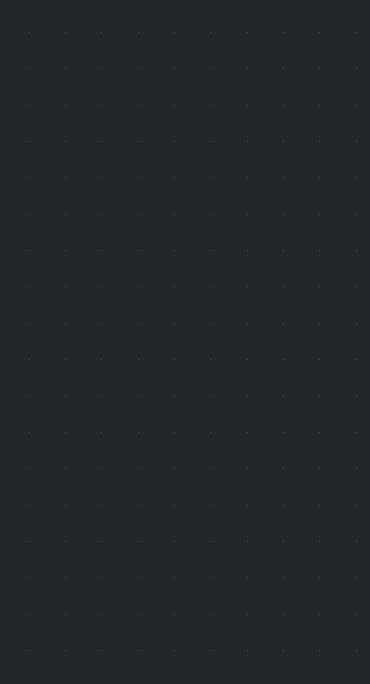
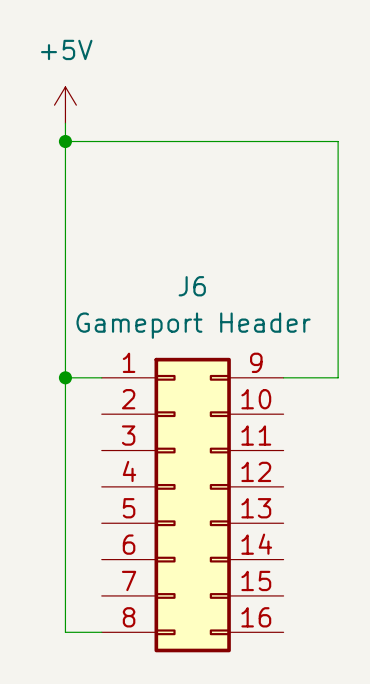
power symbol: none -> +5V (65, 105)
wire: none -> (65, 123) (65, 632) (101, 632)
wire: none -> (65, 141) (338, 141) (338, 377) (283, 377)
junction: none -> (65, 141)
wire: none -> (65, 377) (101, 377)
junction: none -> (65, 377)
J6: none -> Gameport Header (192, 505)

